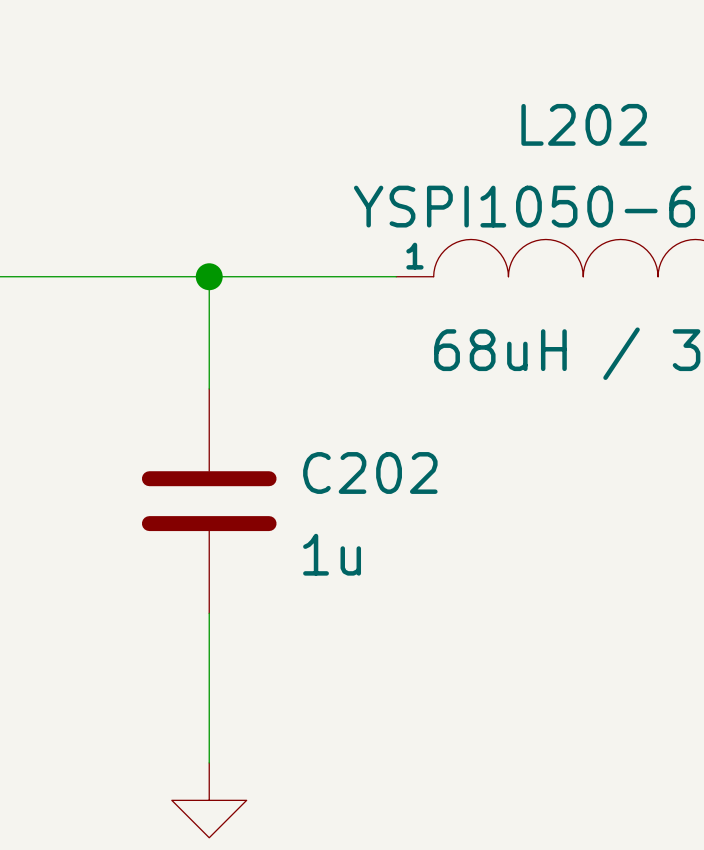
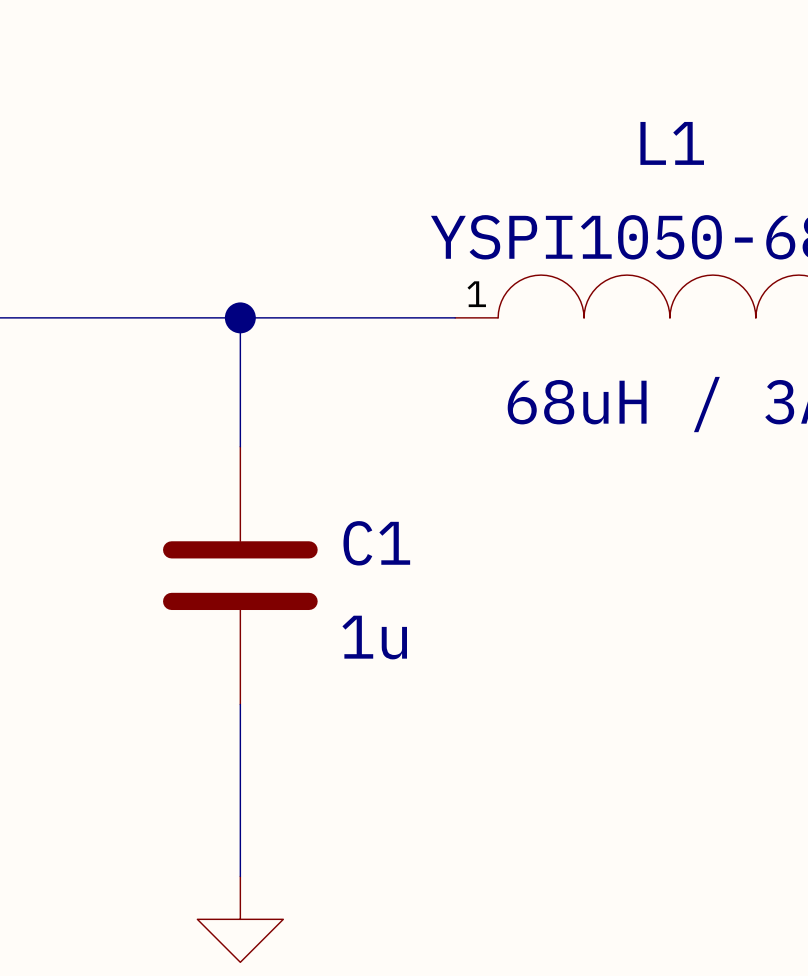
L202 name: L202 (584, 124) -> L1 (672, 143)
C202 name: C202 (370, 472) -> C1 (376, 543)

